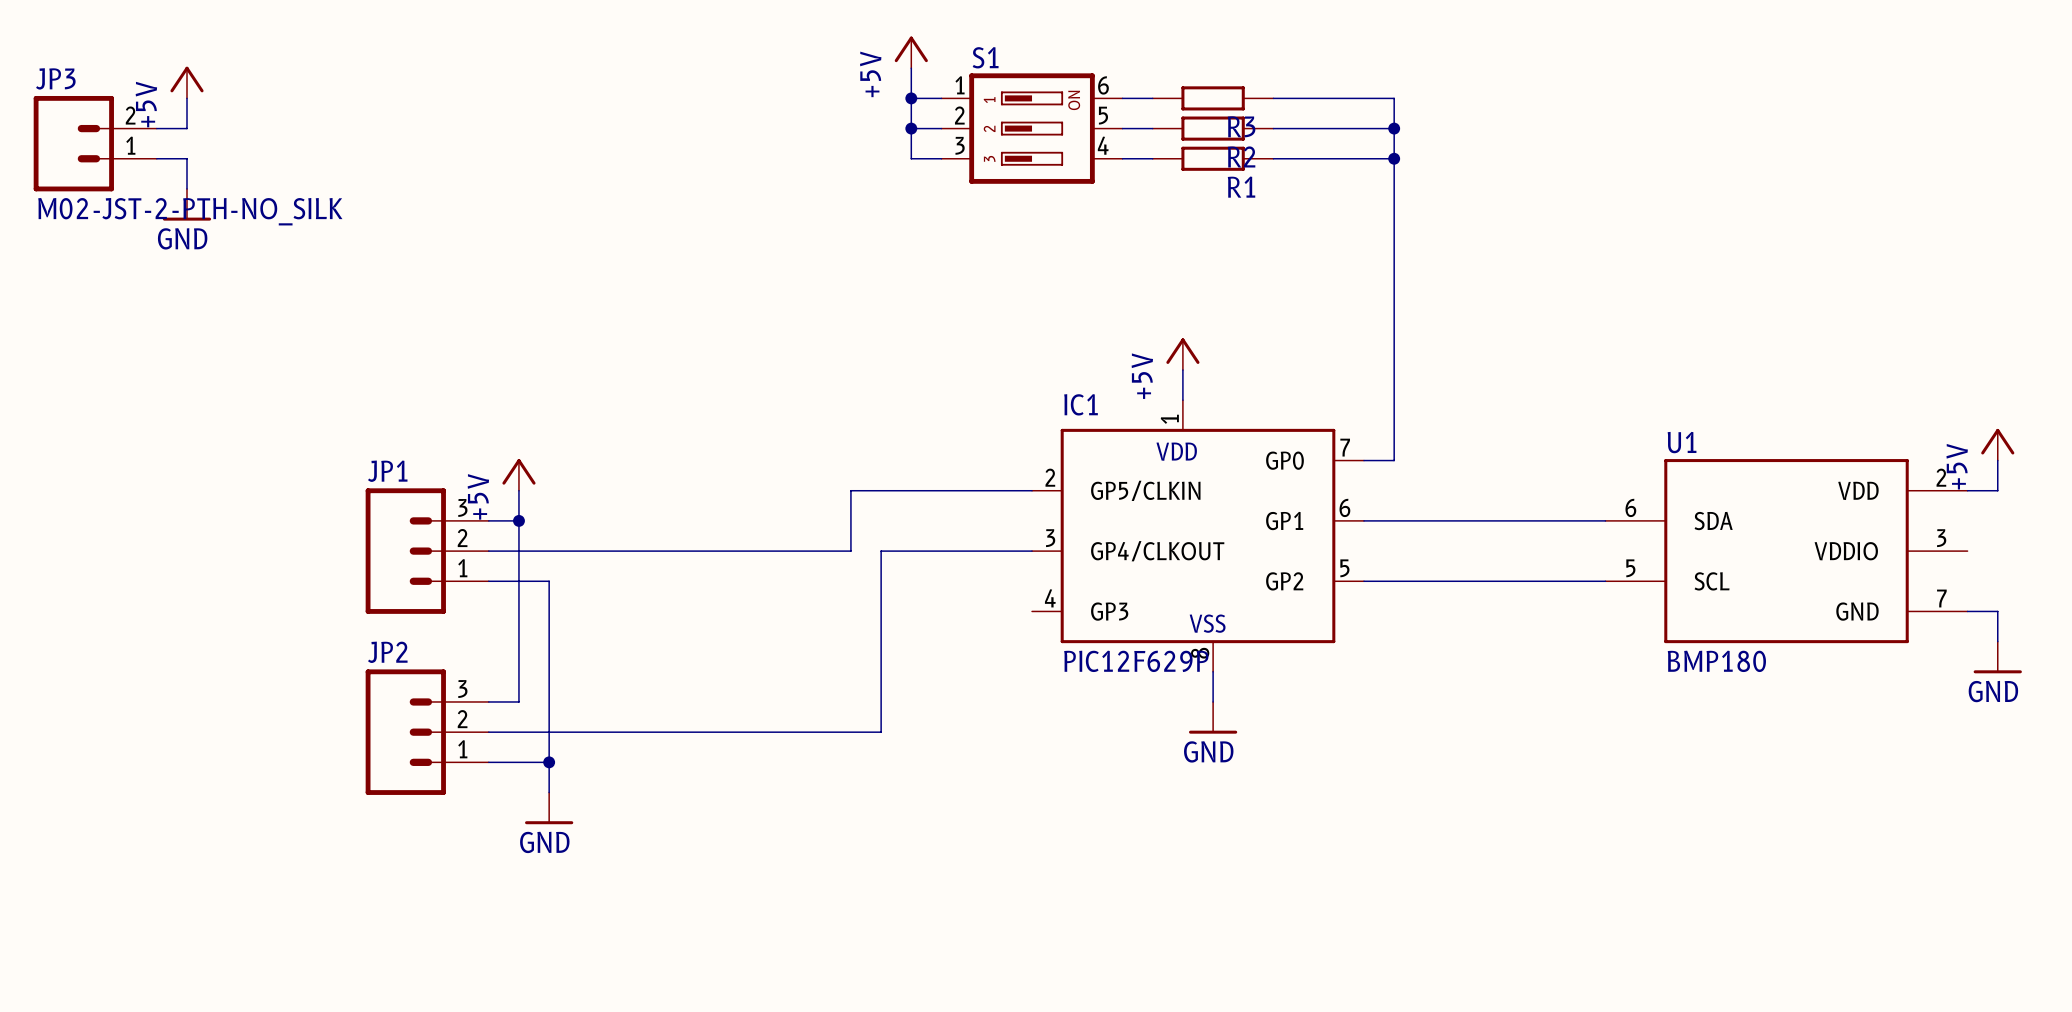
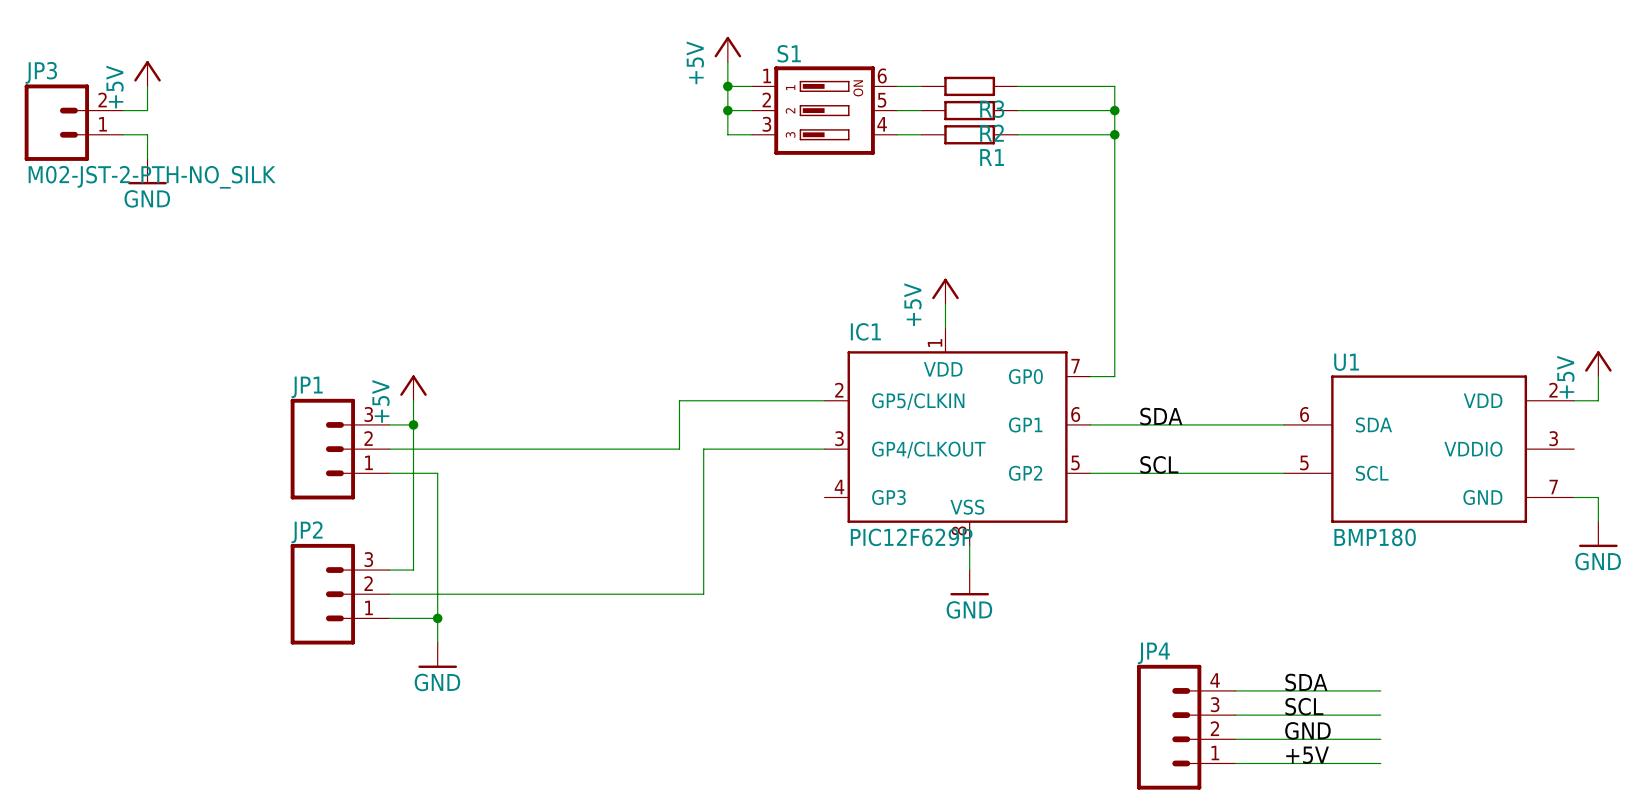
label: none -> SDA (1161, 416)
label: none -> SCL (1159, 464)
label: none -> SDA (1306, 682)
wire: none -> (1235, 690) (1380, 690)
label: none -> SCL (1304, 706)
wire: none -> (1235, 715) (1380, 715)
JP4: none -> (1186, 727)
label: none -> GND (1307, 730)
wire: none -> (1235, 739) (1380, 739)
label: none -> +5V (1307, 755)
wire: none -> (1235, 763) (1380, 763)

